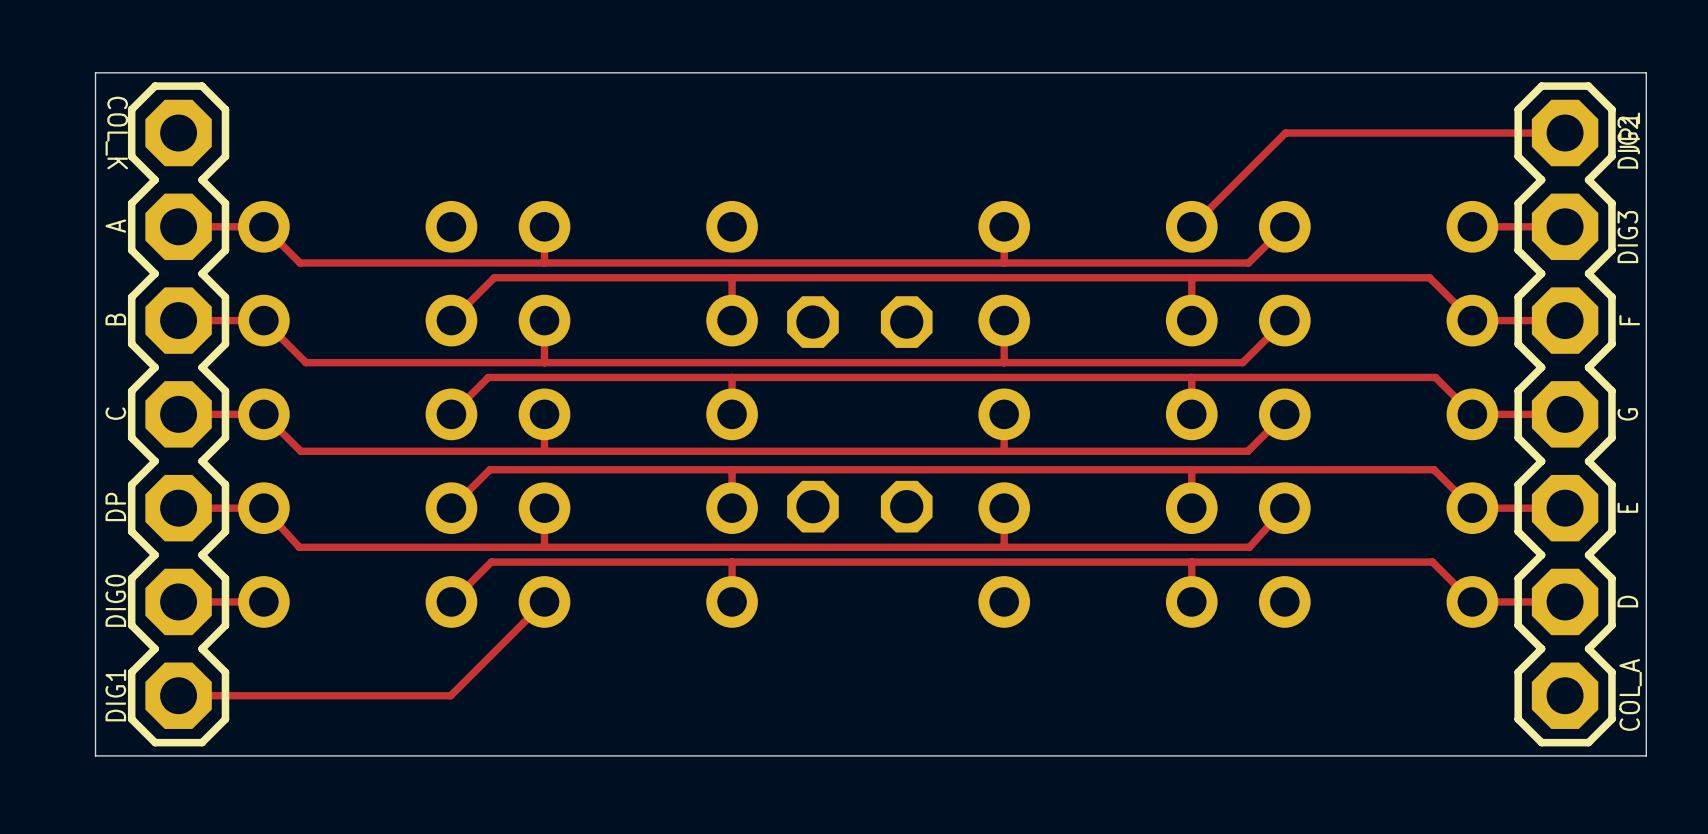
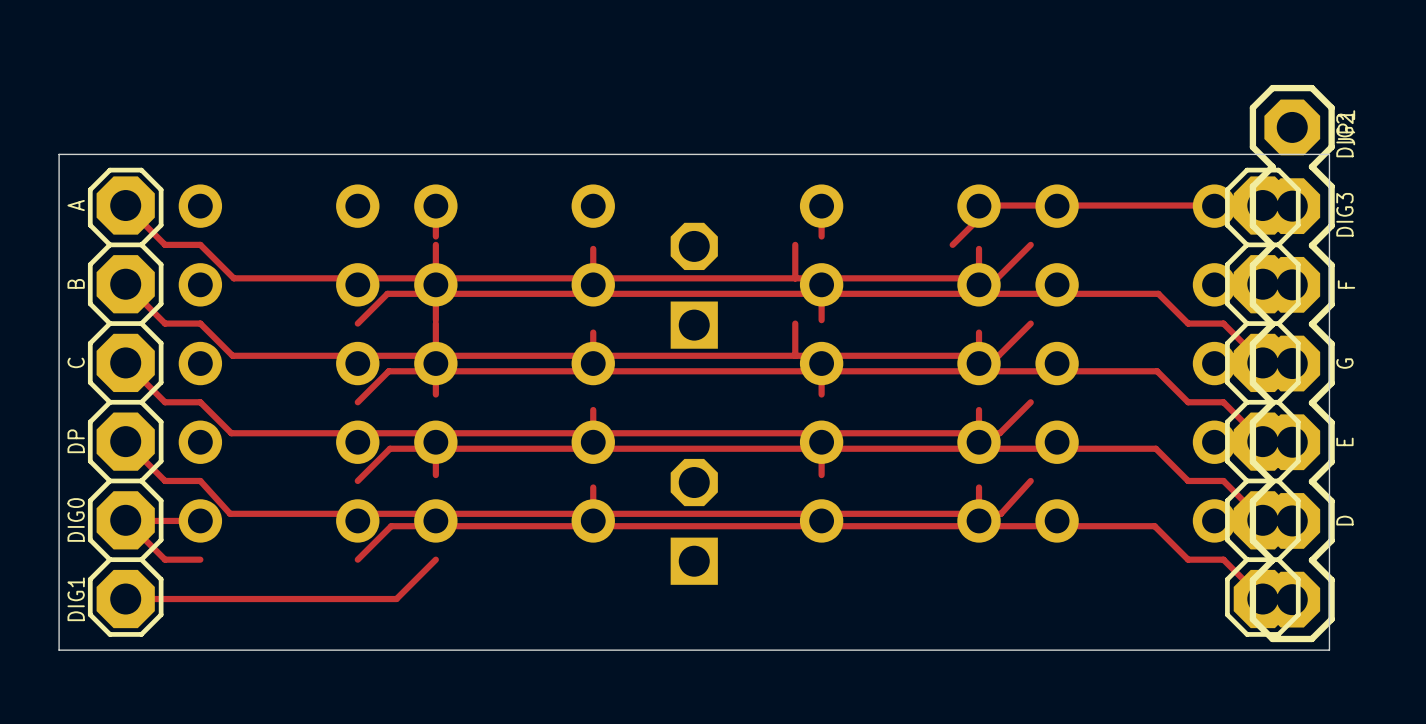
text: COL_K (116, 133) -> none
track: (1565, 133) (1285, 133) (1191, 226) -> none
board edge: (95, 165) (95, 72) (1646, 72) (1646, 755) (1609, 755) -> (59, 154) (1329, 154) (1329, 650)
track: none -> (125, 205) (165, 244) (200, 244) (233, 278) (997, 278) (1030, 244)
track: (178, 226) (263, 226) (300, 262) (1248, 262) (1284, 226) -> none
track: none -> (1262, 205) (992, 205) (952, 244)
track: none -> (435, 244) (435, 278)
track: none -> (795, 244) (795, 278)
part footprint: [787, 296, 933, 348] -> [670, 222, 718, 349]
track: none -> (125, 284) (165, 323) (200, 323) (232, 355) (998, 355) (1030, 323)
track: (178, 320) (263, 320) (305, 362) (1242, 362) (1284, 320) -> none
track: (451, 320) (494, 277) (1429, 277) (1472, 320) (1565, 320) -> none
track: none -> (357, 323) (387, 293) (1158, 293) (1188, 323) (1223, 323) (1262, 362)
track: none -> (435, 323) (435, 355)
track: none -> (795, 323) (795, 355)
track: none -> (125, 362) (165, 402) (200, 402) (231, 433) (999, 433) (1030, 402)
track: (178, 414) (263, 414) (300, 451) (1247, 451) (1284, 414) -> none
part: (178, 414) -> none
track: (451, 414) (488, 377) (1435, 377) (1472, 414) (1565, 414) -> none
part: none -> (125, 402)
track: none -> (357, 402) (388, 371) (1157, 371) (1188, 402) (1223, 402) (1262, 441)
part: none -> (1262, 402)
part: (859, 506) -> none
track: none -> (125, 441) (165, 480) (200, 480) (230, 513) (1001, 513) (1030, 480)
track: (178, 508) (263, 508) (299, 547) (1249, 547) (1284, 508) -> none
track: (451, 508) (489, 469) (1434, 469) (1472, 508) (1565, 508) -> none
track: none -> (357, 480) (390, 448) (1155, 448) (1188, 480) (1223, 480) (1262, 520)
track: none -> (125, 520) (165, 559) (200, 559)
track: (451, 601) (491, 562) (1432, 562) (1472, 601) (1565, 601) -> none
track: (544, 601) (450, 695) (178, 695) -> none
part: none -> (694, 521)
track: none -> (357, 559) (391, 526) (1154, 526) (1188, 559) (1223, 559) (1262, 599)
track: none -> (435, 559) (396, 599) (125, 599)
text: COL_A (1630, 694) -> none

